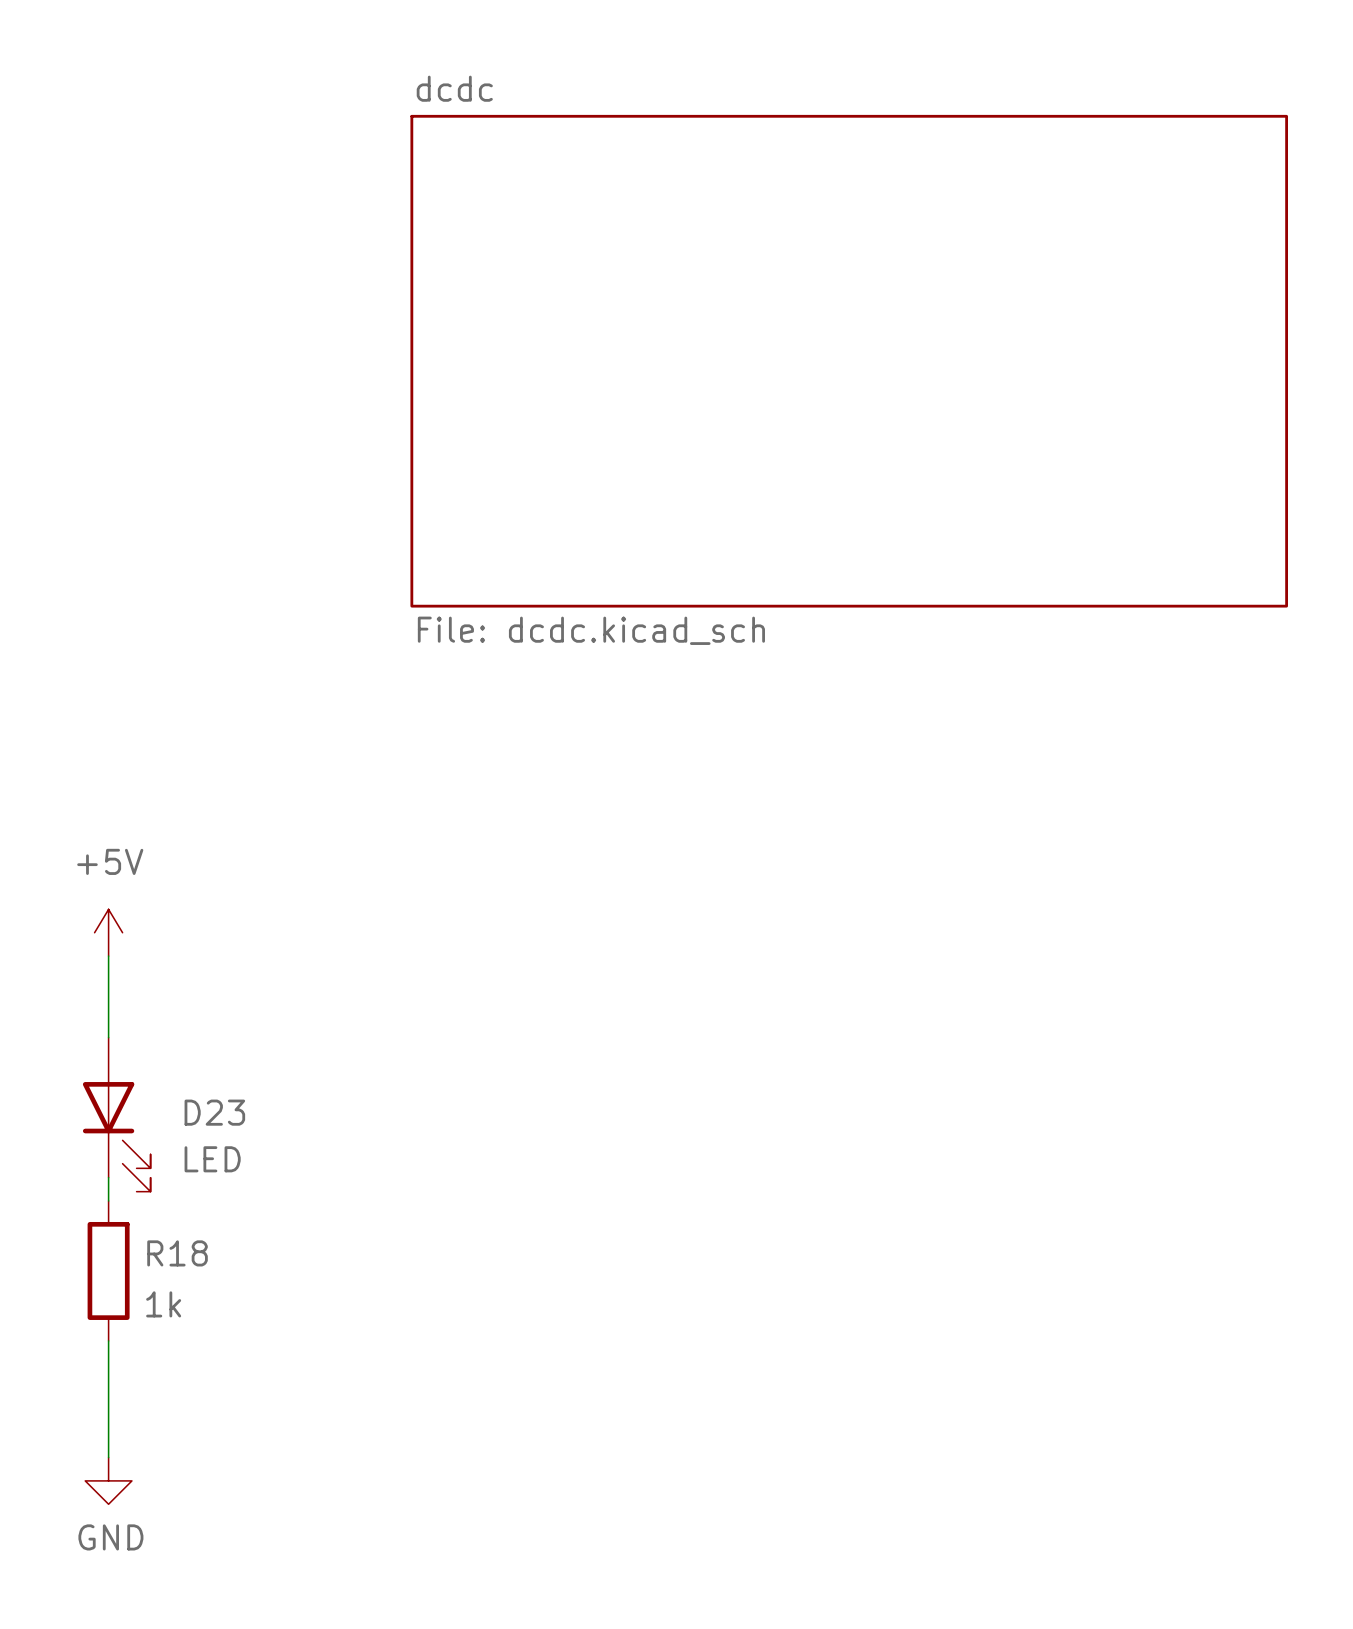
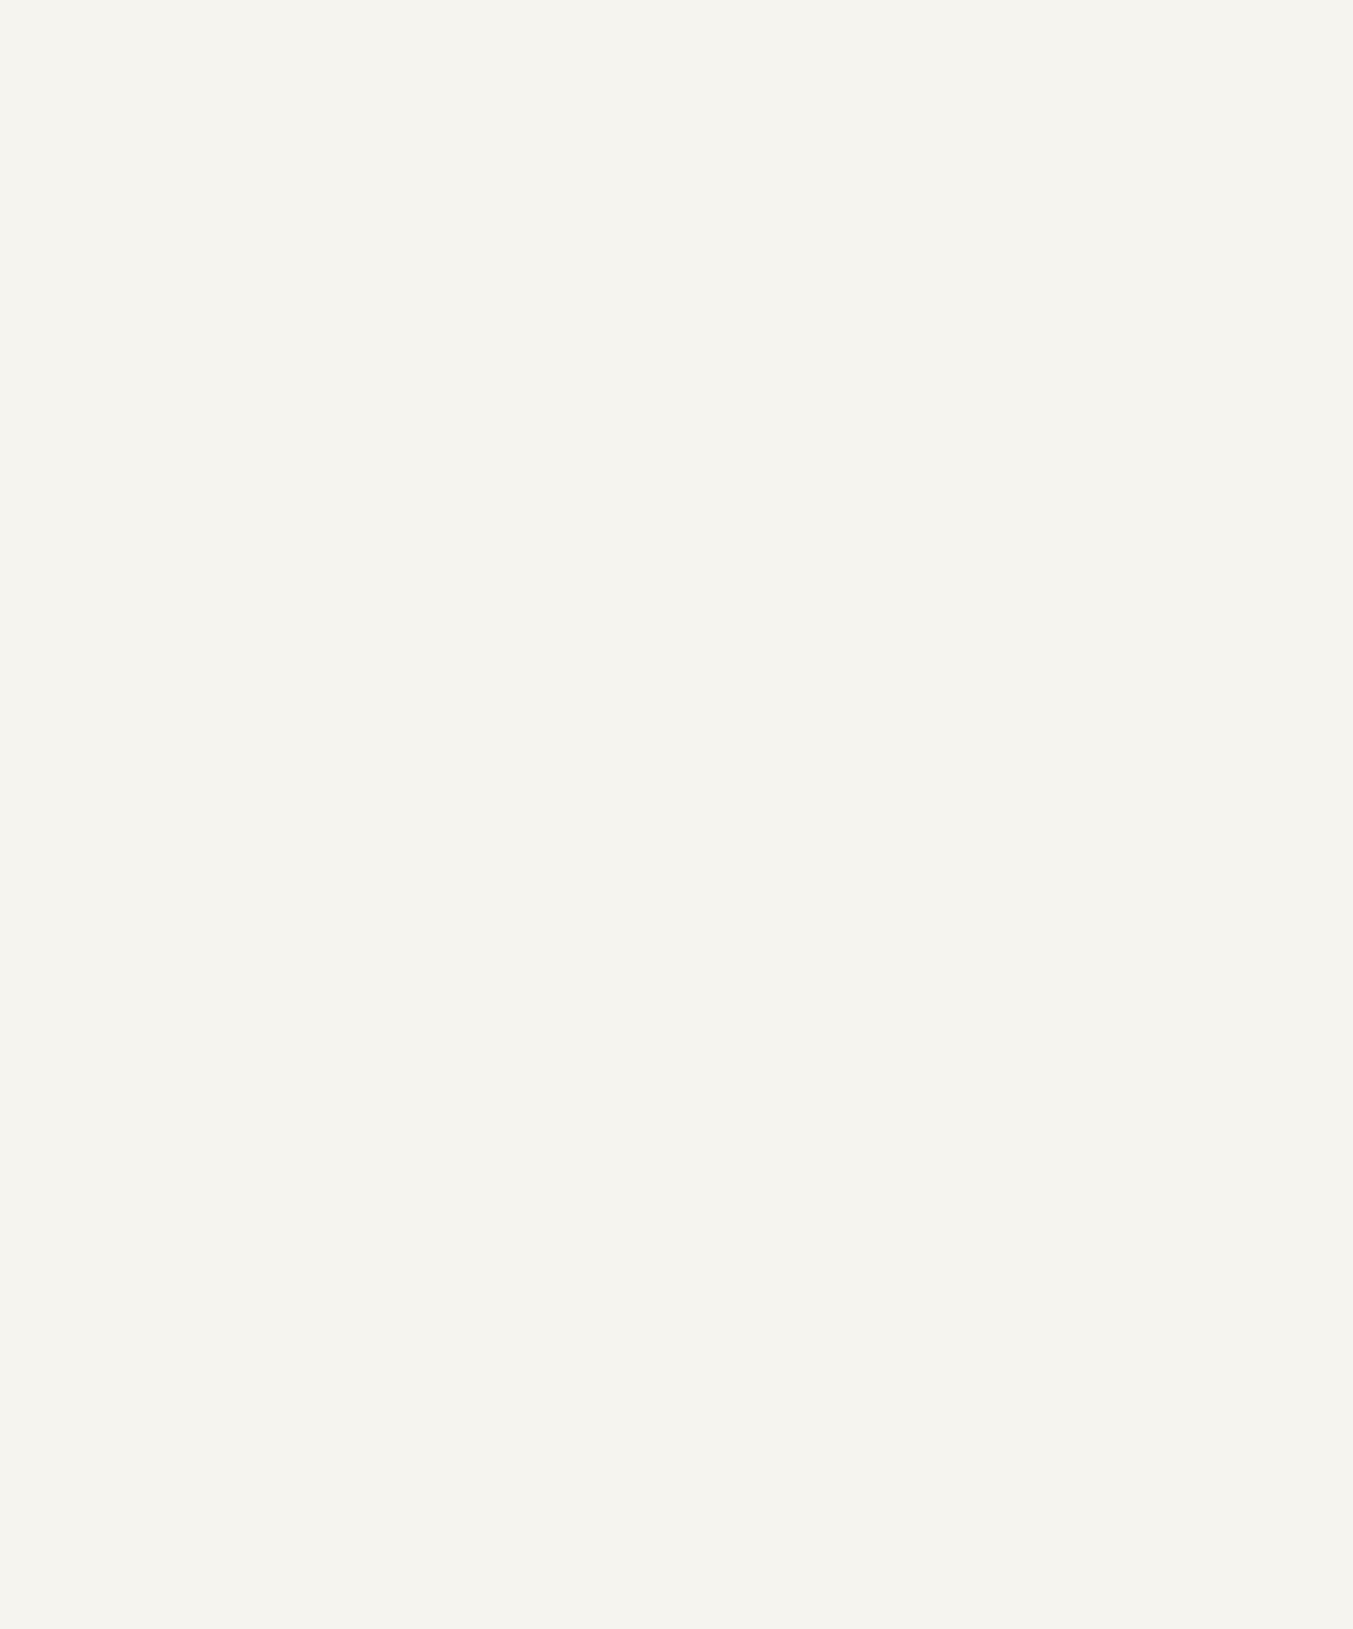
sheet dcdc: File: dcdc.kicad_sch (849, 361) -> none
power symbol: +5V (108, 932) -> none
wire: (108, 956) (108, 1037) -> none
D23: LED (116, 1114) -> none
wire: (108, 1177) (108, 1200) -> none
R18: 1k (108, 1270) -> none
wire: (108, 1340) (108, 1457) -> none
power symbol: GND (108, 1480) -> none

